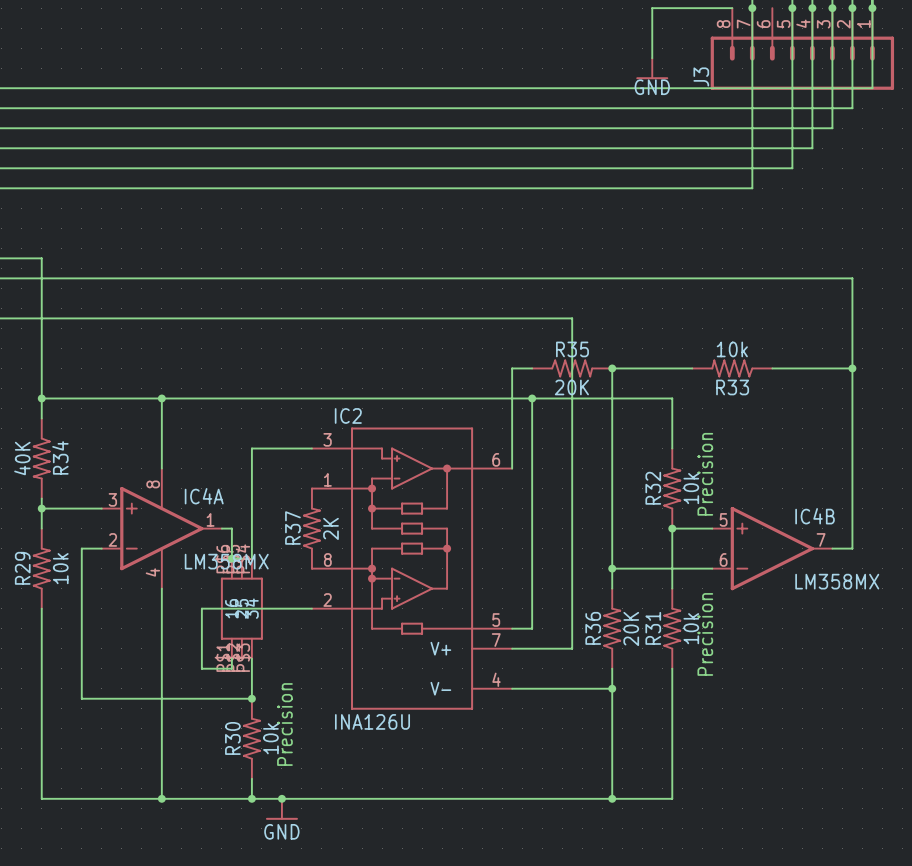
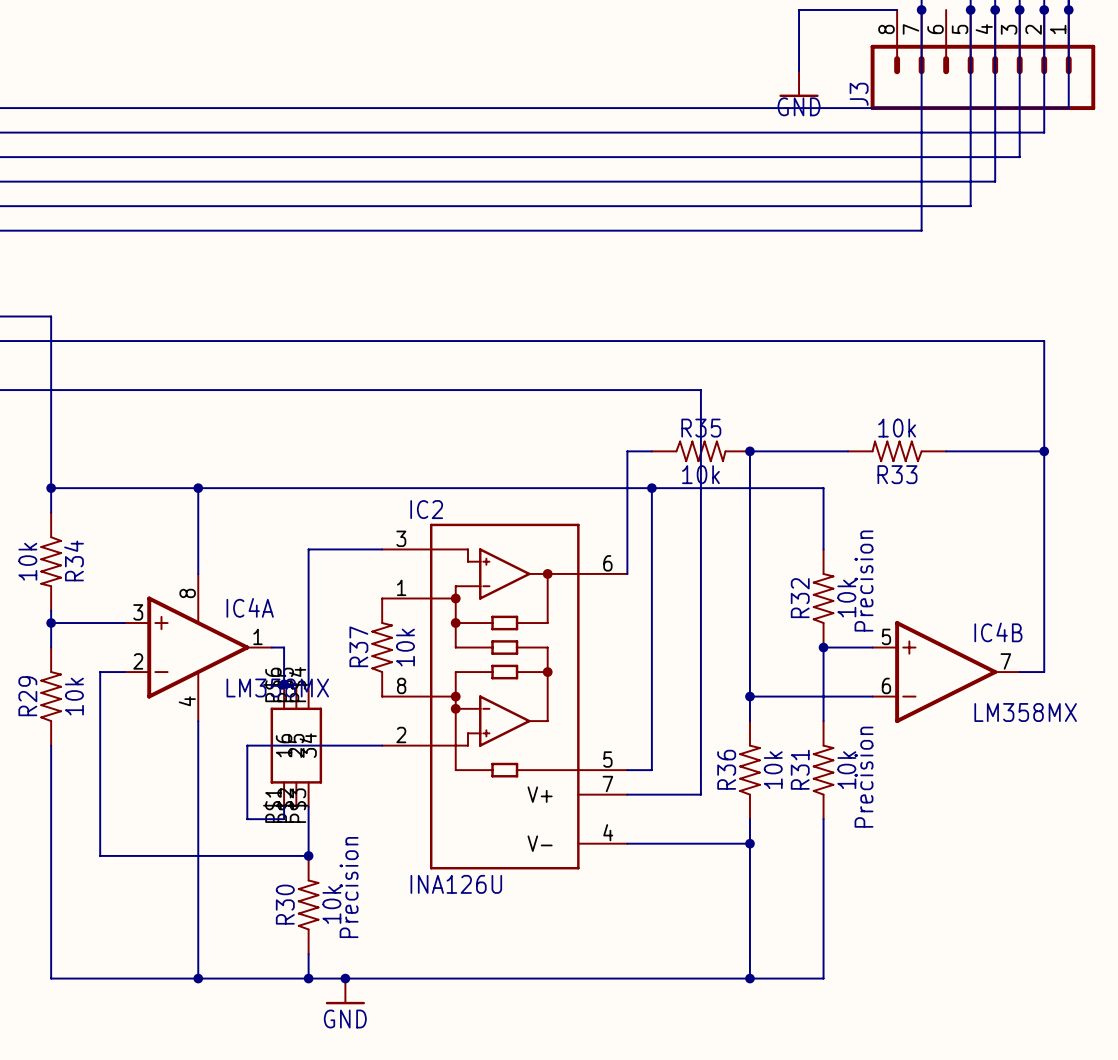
R35 value: 20K (571, 387) -> 10k (700, 474)
R34 value: 40K (22, 458) -> 10k (27, 561)
R37 value: 2K (330, 528) -> 10k (405, 647)
R36 value: 20K (631, 628) -> 10k (773, 770)

